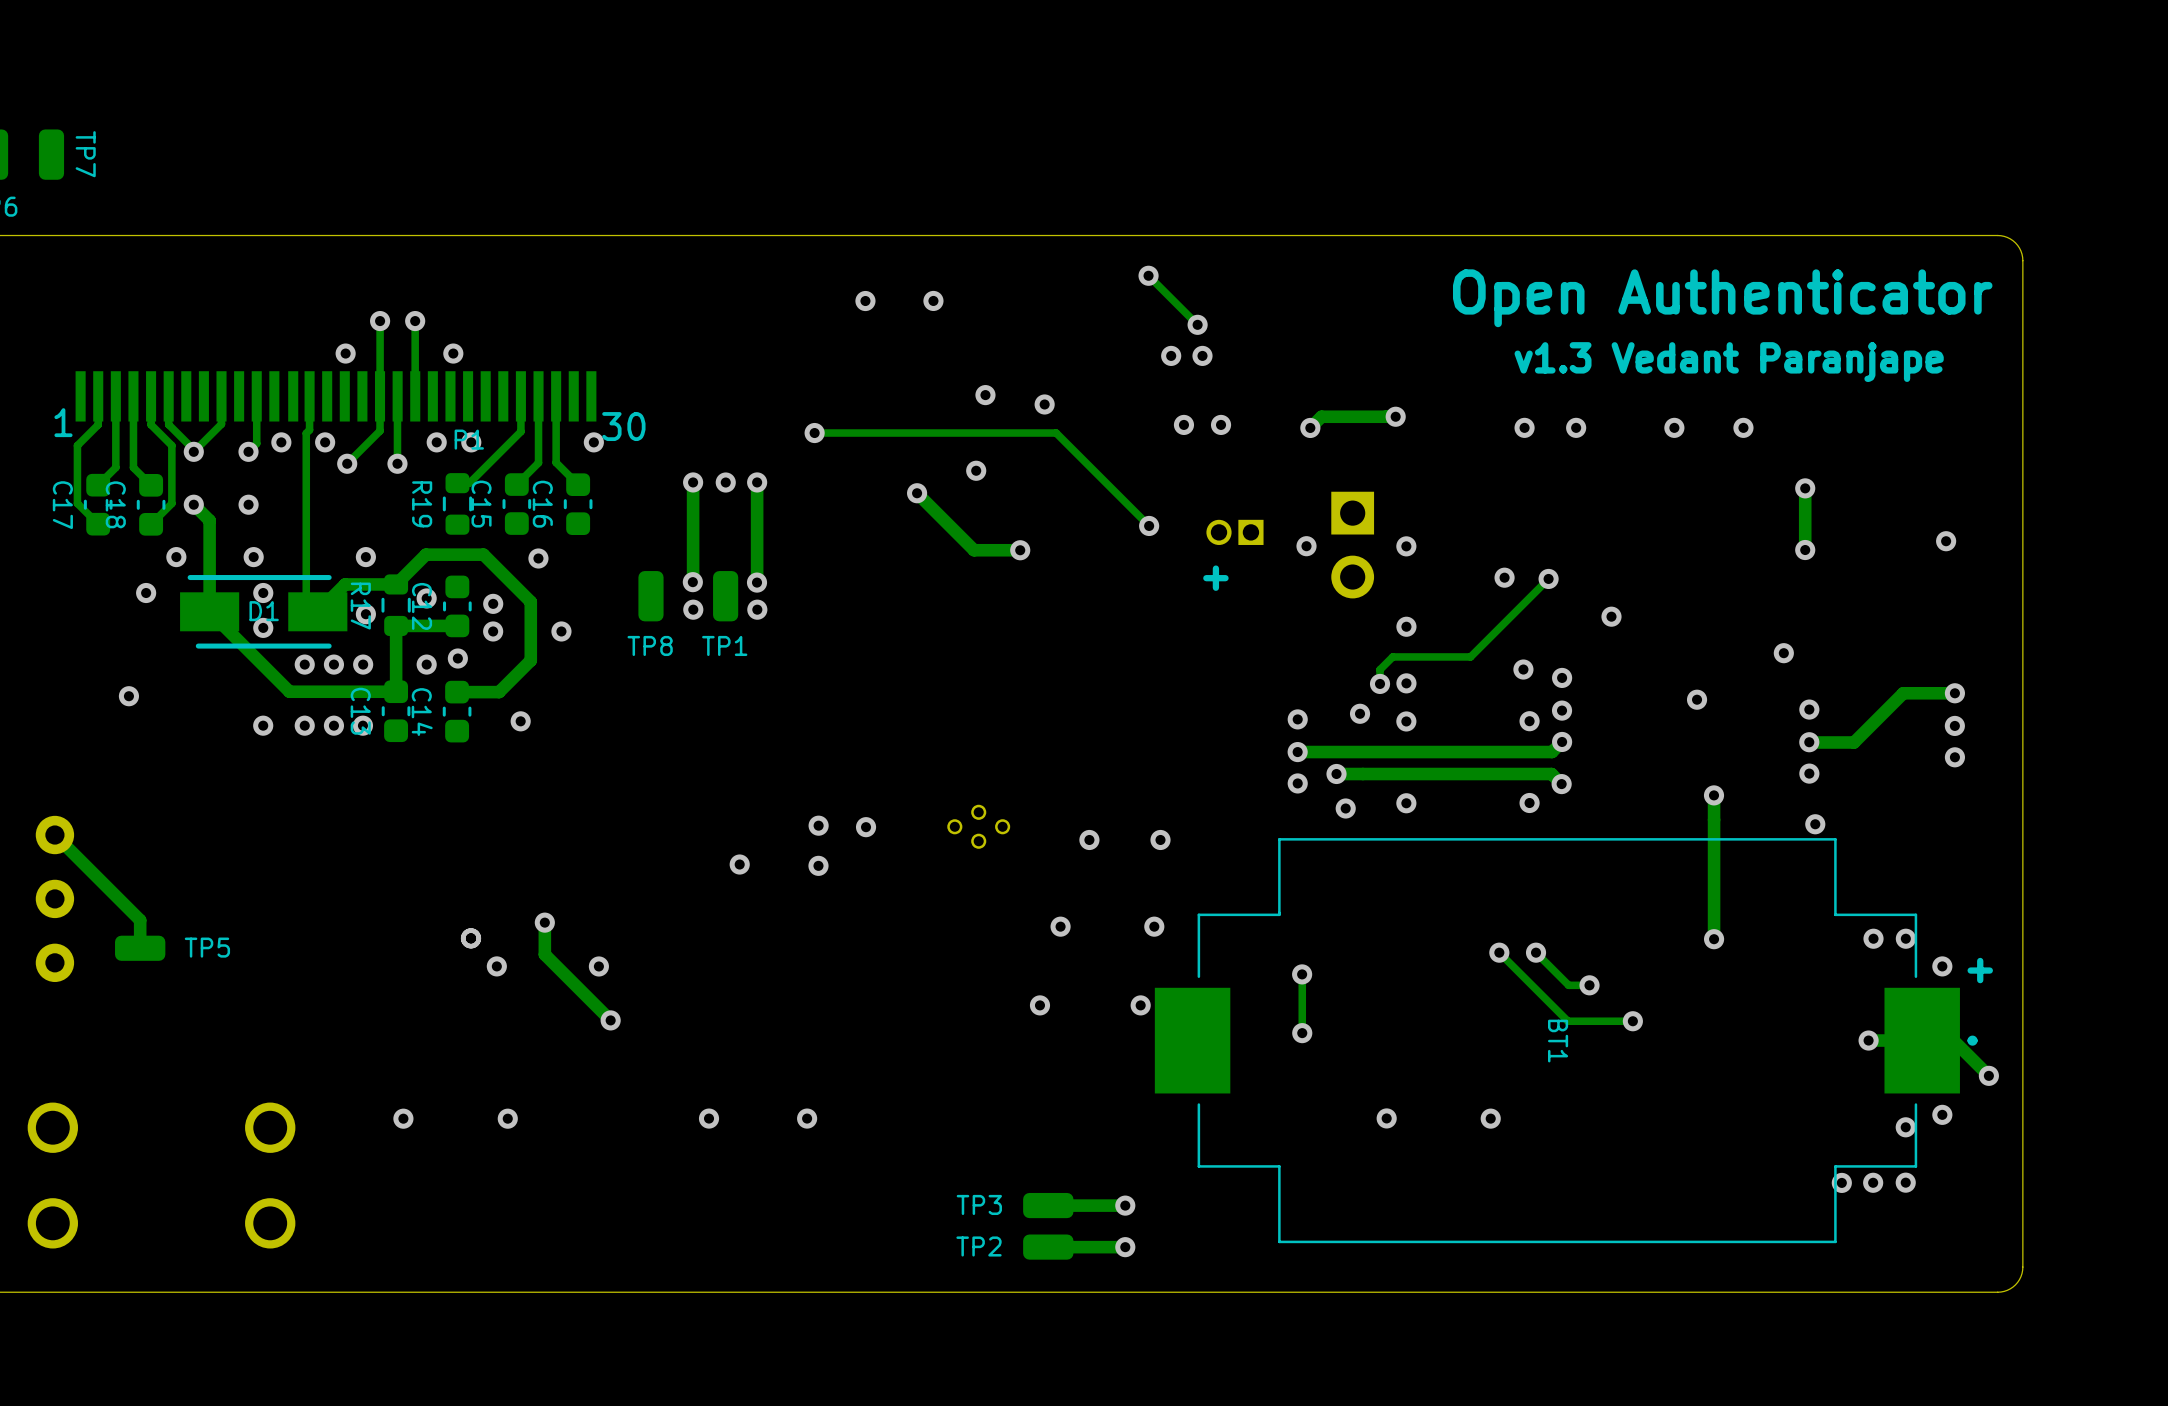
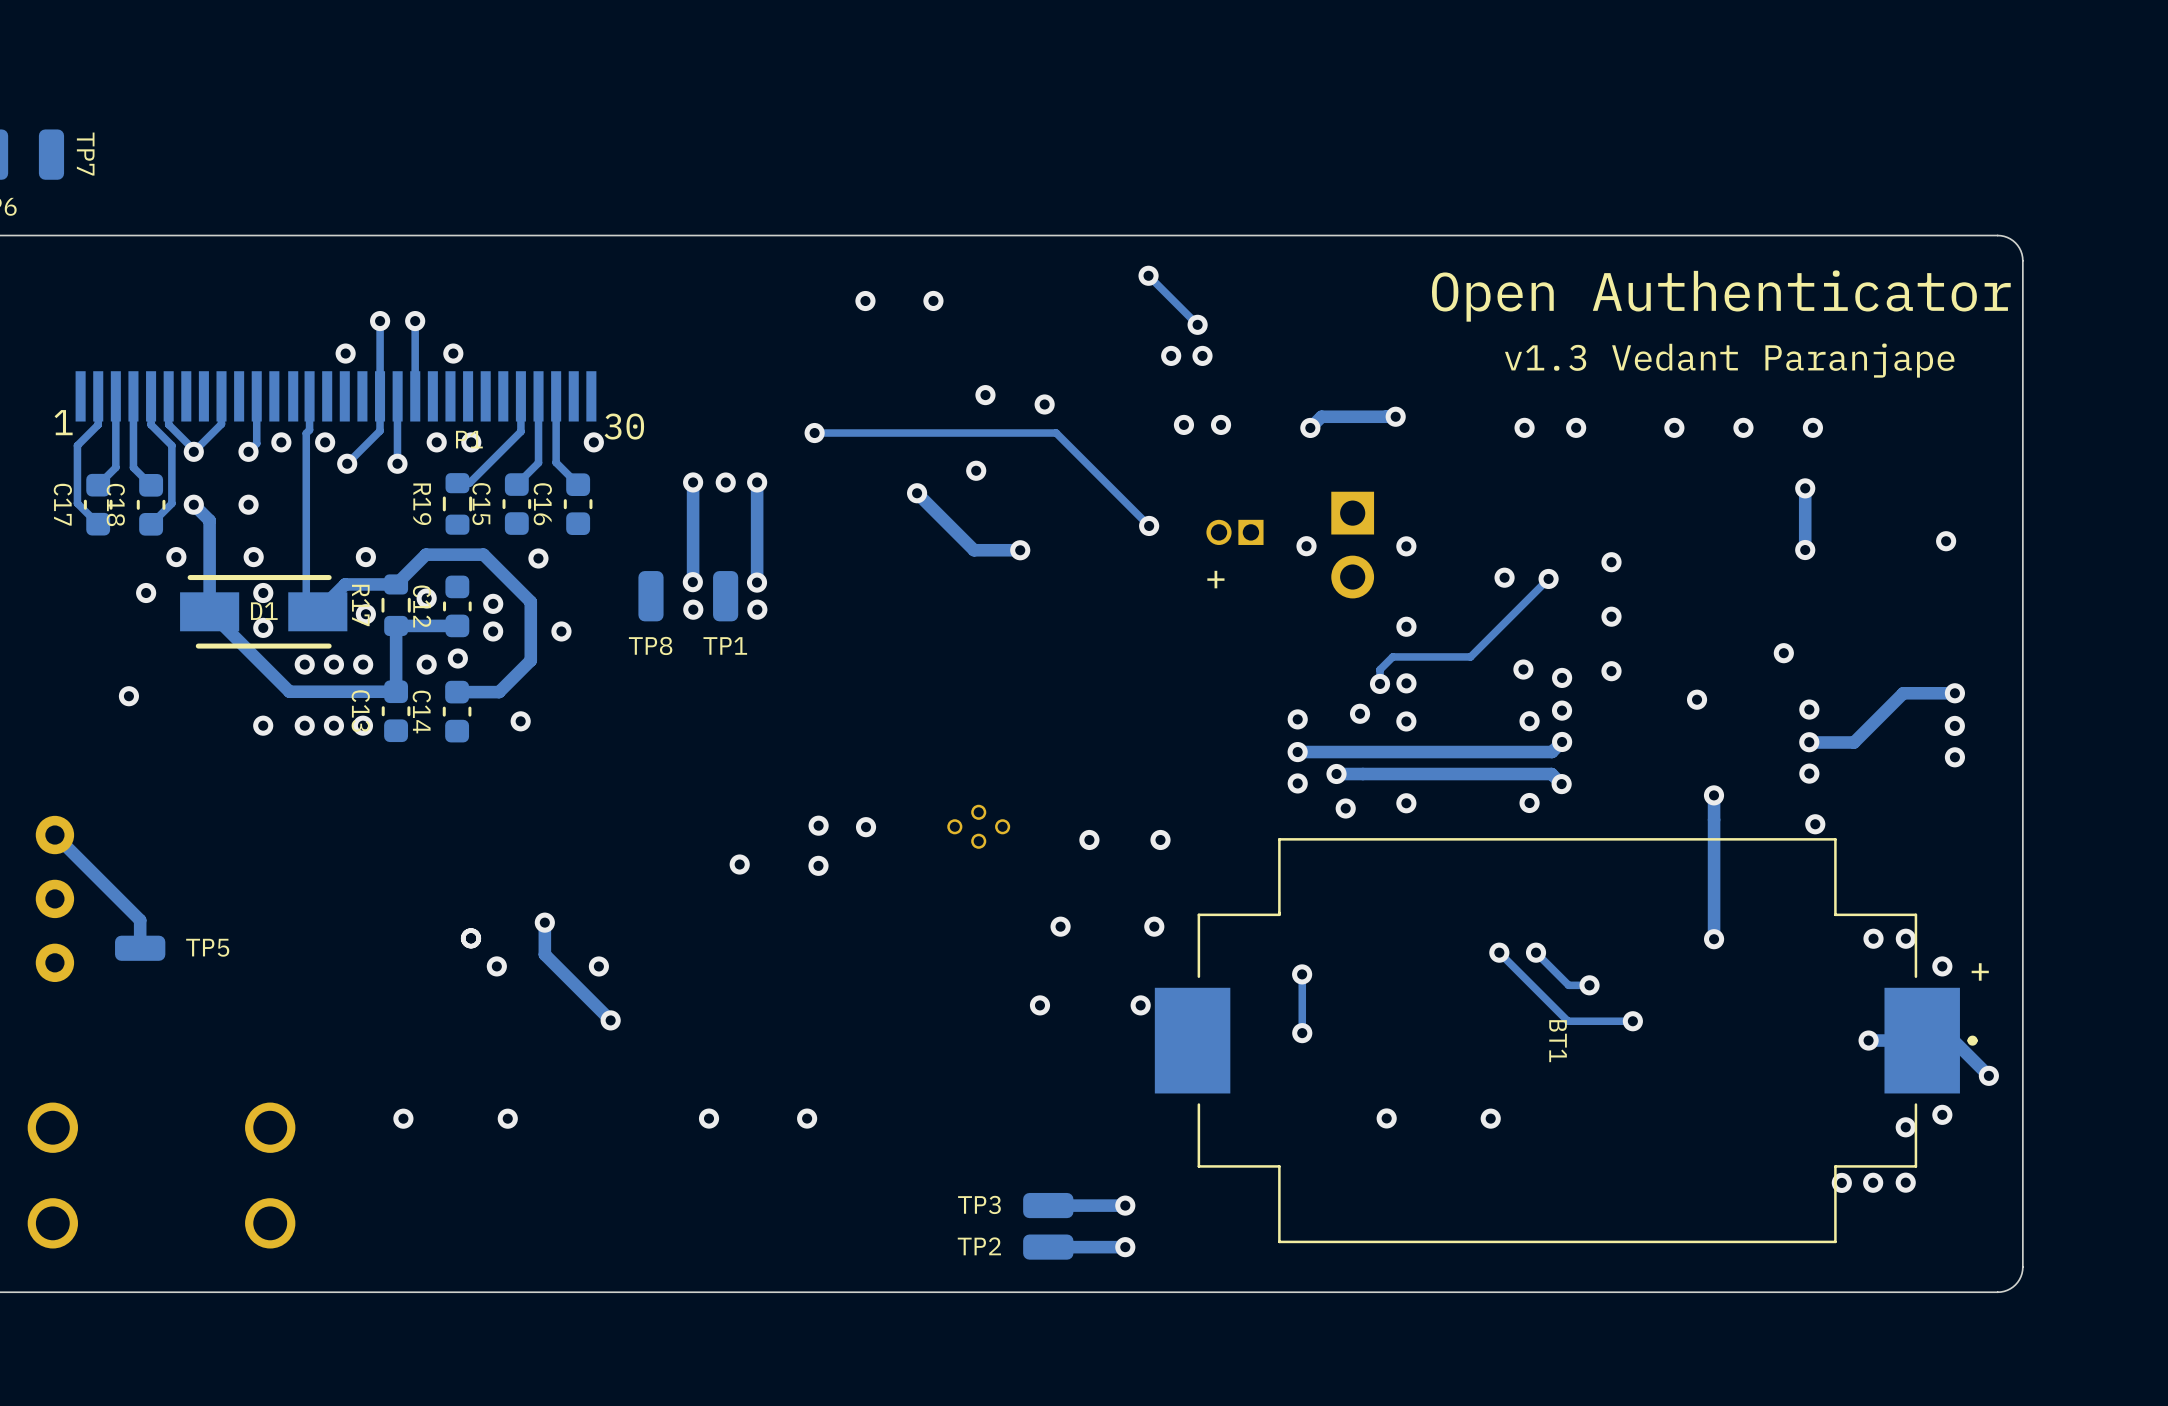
via: none -> (1812, 427)
via: none -> (1611, 562)
via: none -> (1611, 671)

